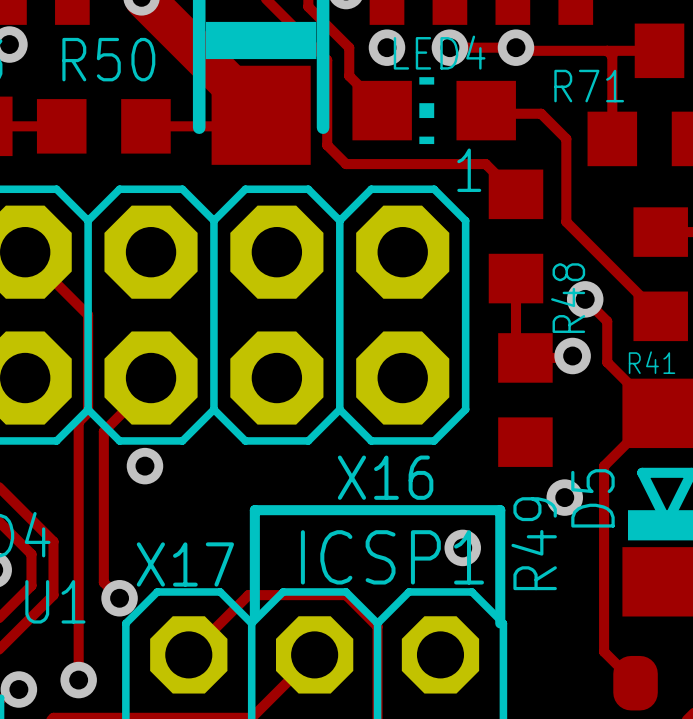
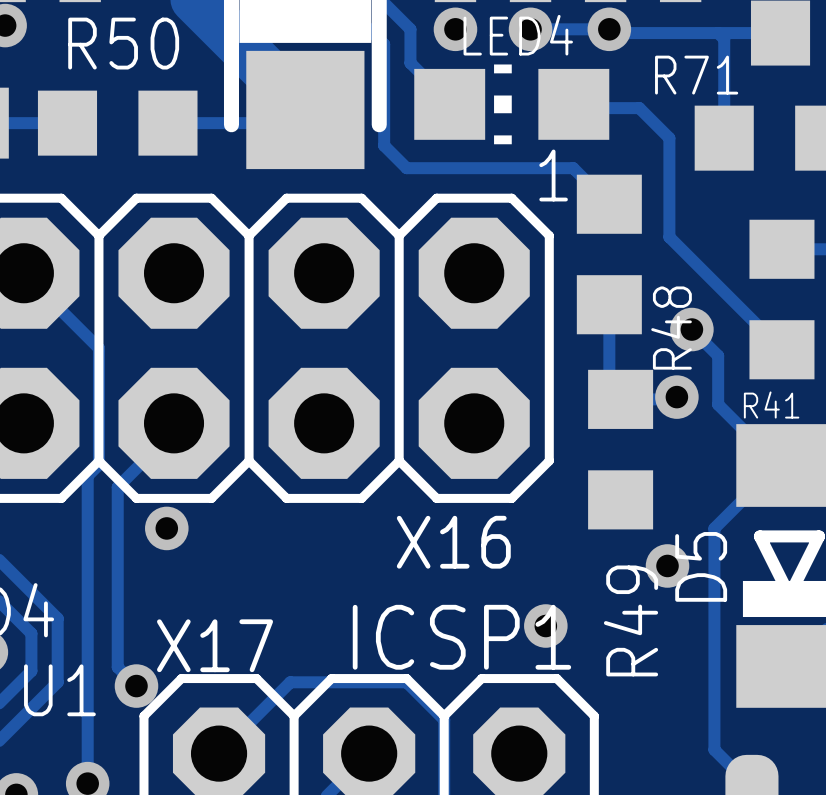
line: (254, 617) (254, 510) (500, 510) (500, 623) -> none

